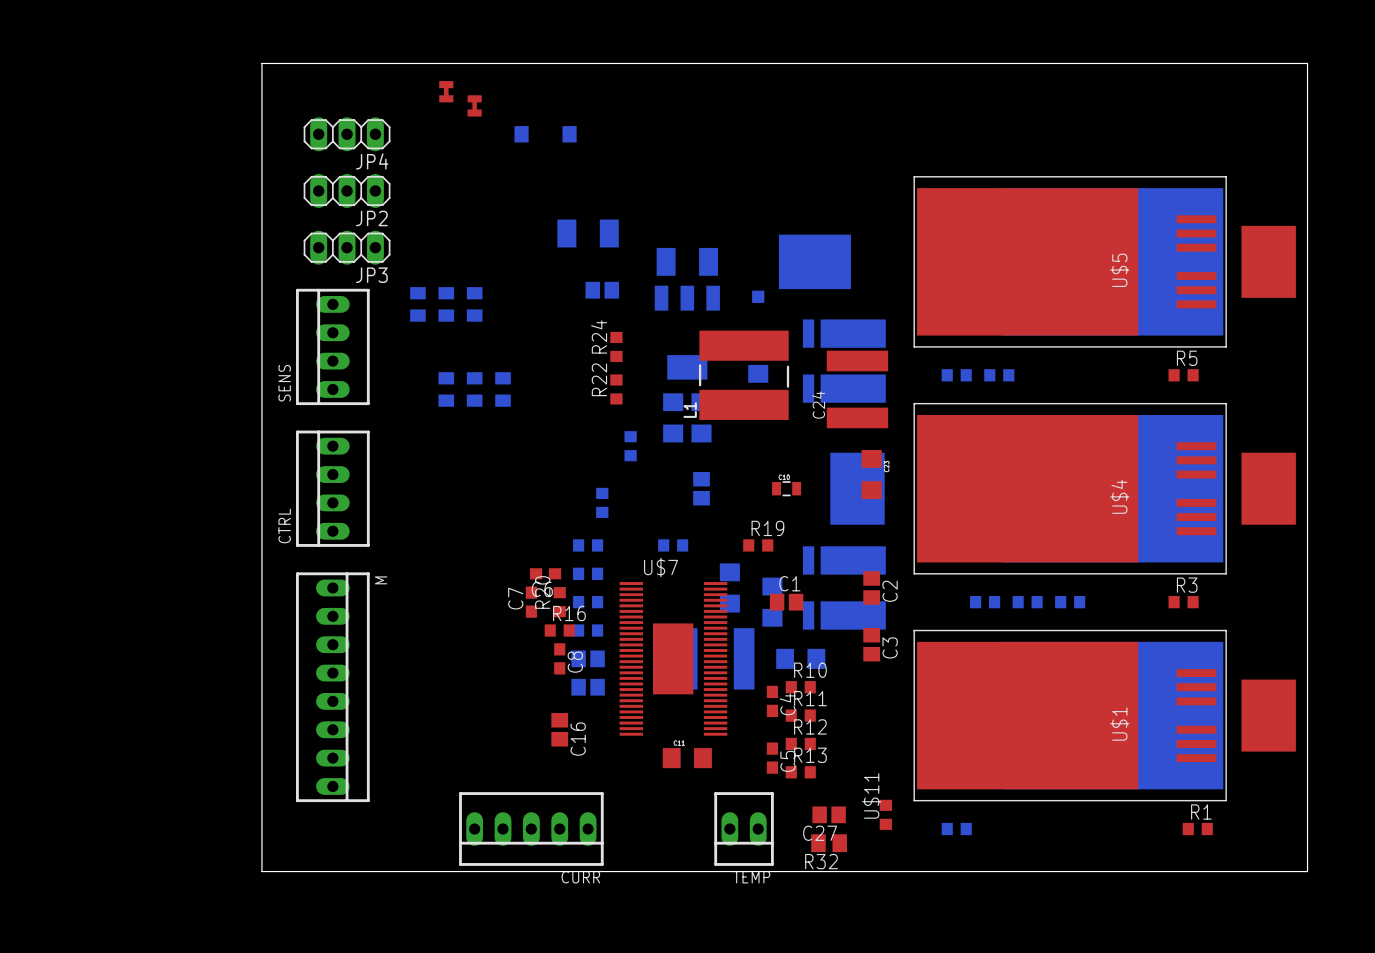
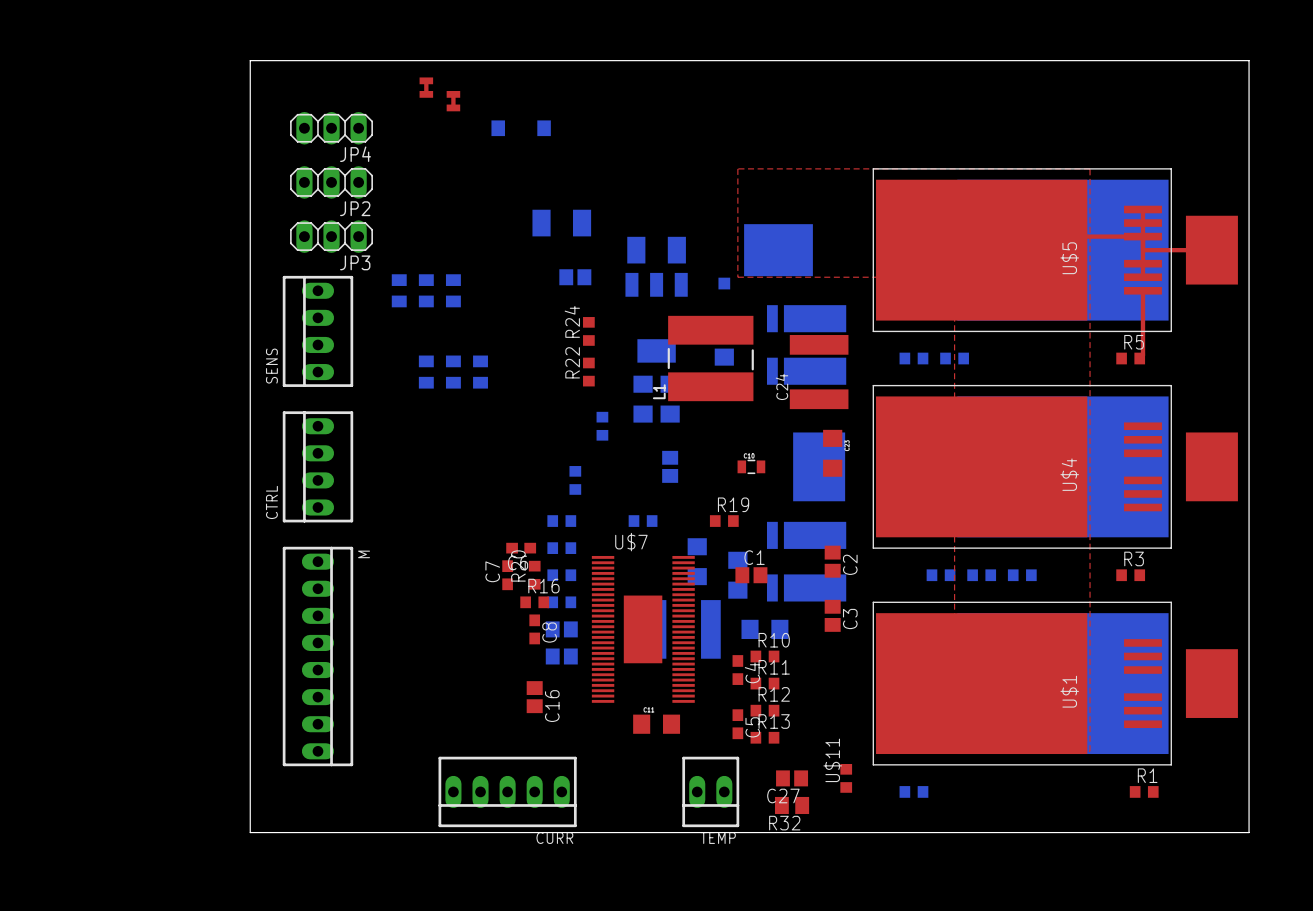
top zone outline: none -> (737, 168) (1090, 168) (1090, 751) (954, 751) (954, 277) (737, 277) (737, 168)
top track: none -> (1142, 209) (1142, 277)
top track: none -> (1142, 236) (1076, 236) (1062, 250)
top track: none -> (1142, 250) (1211, 250)
top track: none -> (1142, 290) (1142, 355) (1139, 358)

